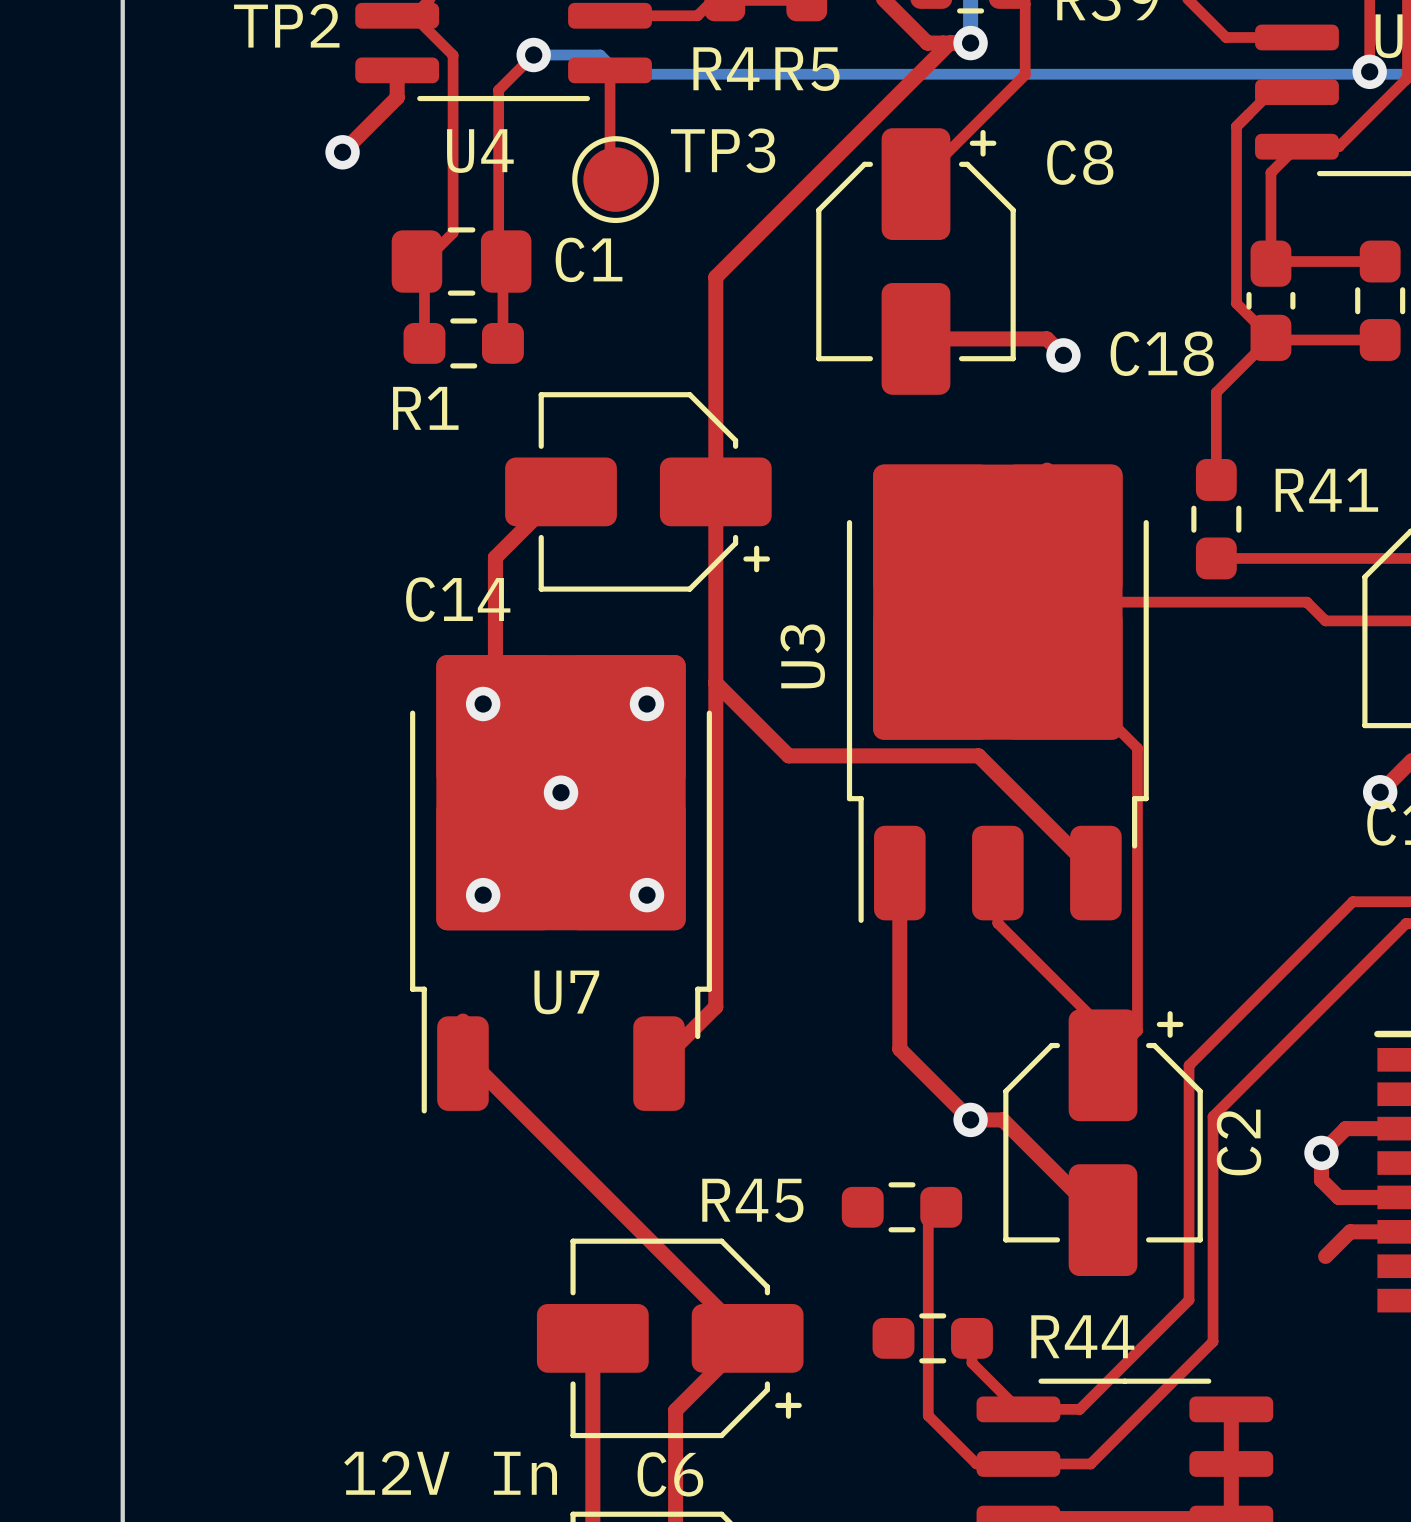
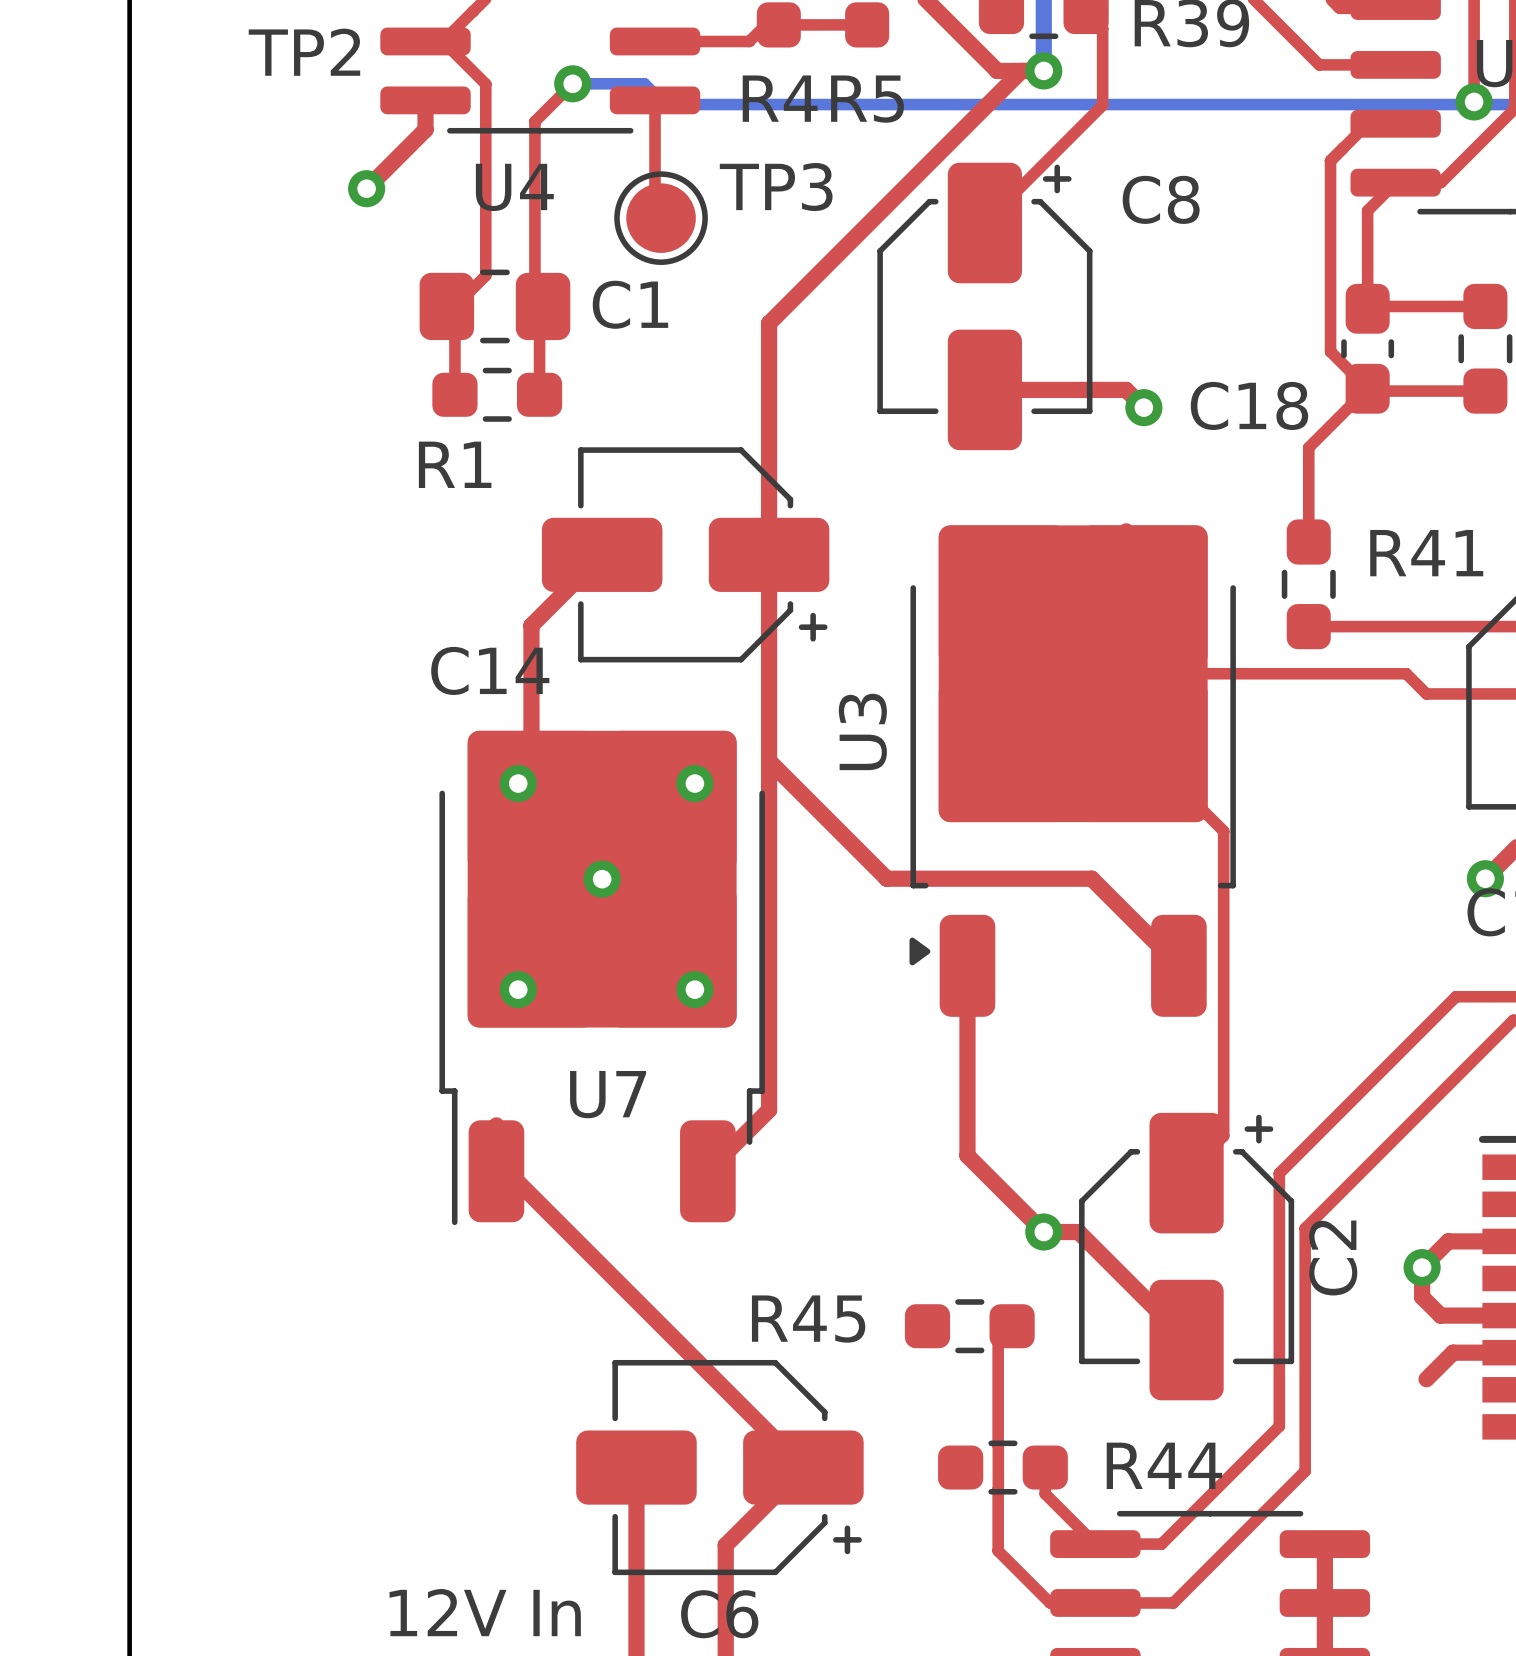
U3 footprint: [846, 464, 1149, 923] -> [909, 525, 1236, 1017]
top track: (788, 755) (978, 755) (1015, 792) -> (847, 839) (886, 878) (1091, 878)
top track: (997, 873) (997, 923) (1103, 1028) -> none

